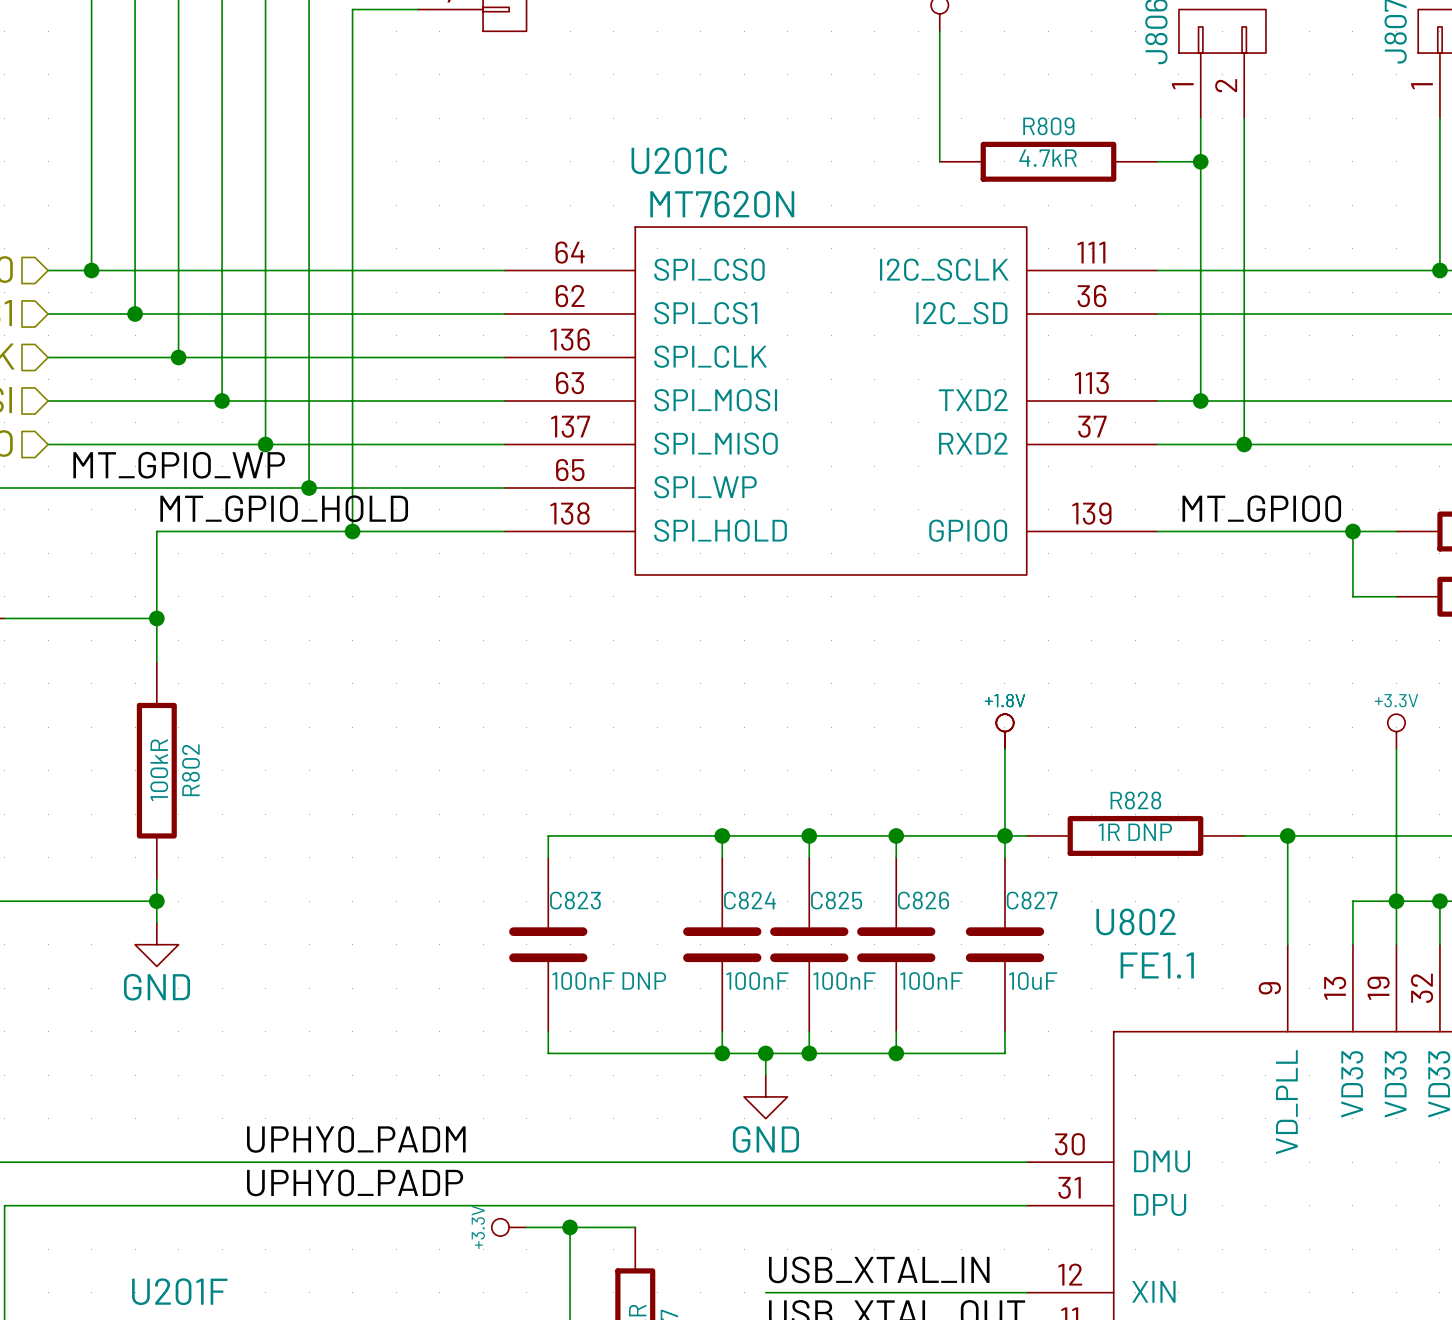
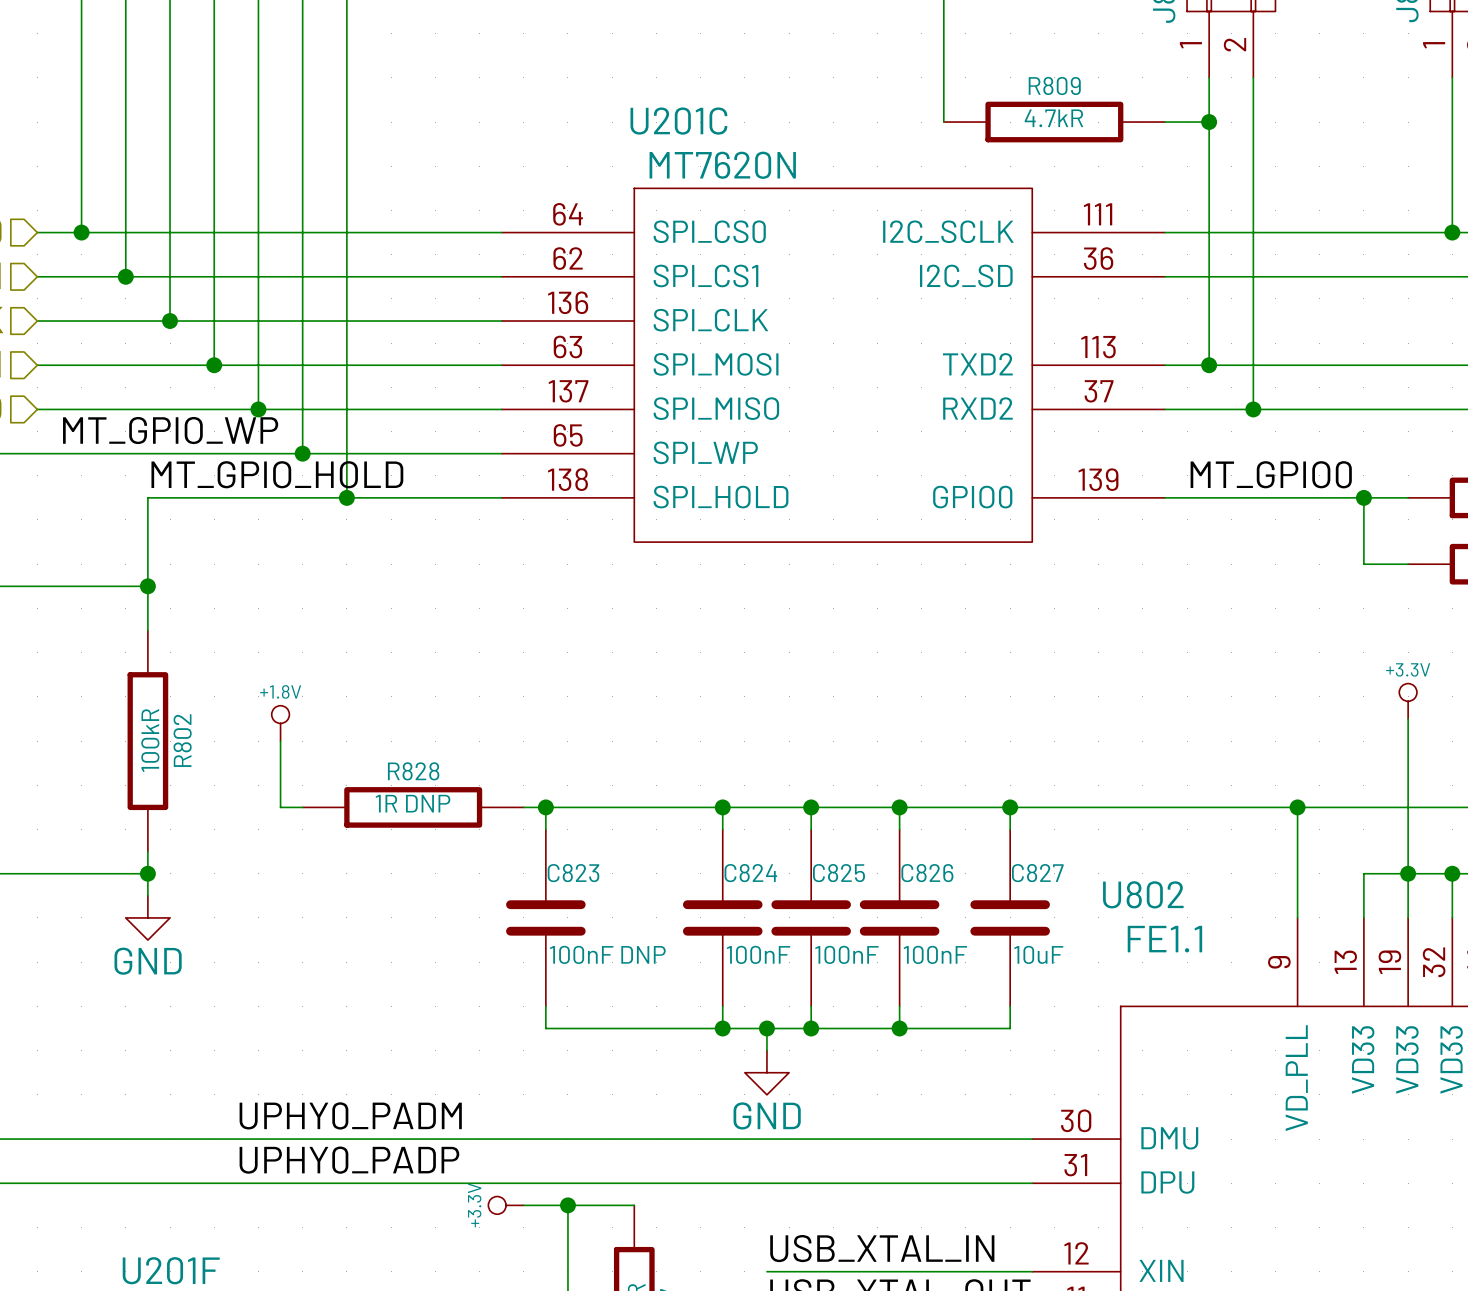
power symbol: +1.8V (1004, 731) -> none
wire: (1004, 748) (1004, 835) -> none
power symbol: none -> +1.8V (280, 723)
wire: none -> (280, 741) (280, 807) (302, 807)
wire: none -> (523, 807) (545, 807)
junction: none -> (545, 807)
wire: none -> (1032, 807) (1253, 807)
R828 position: (1135, 835) -> (413, 807)

